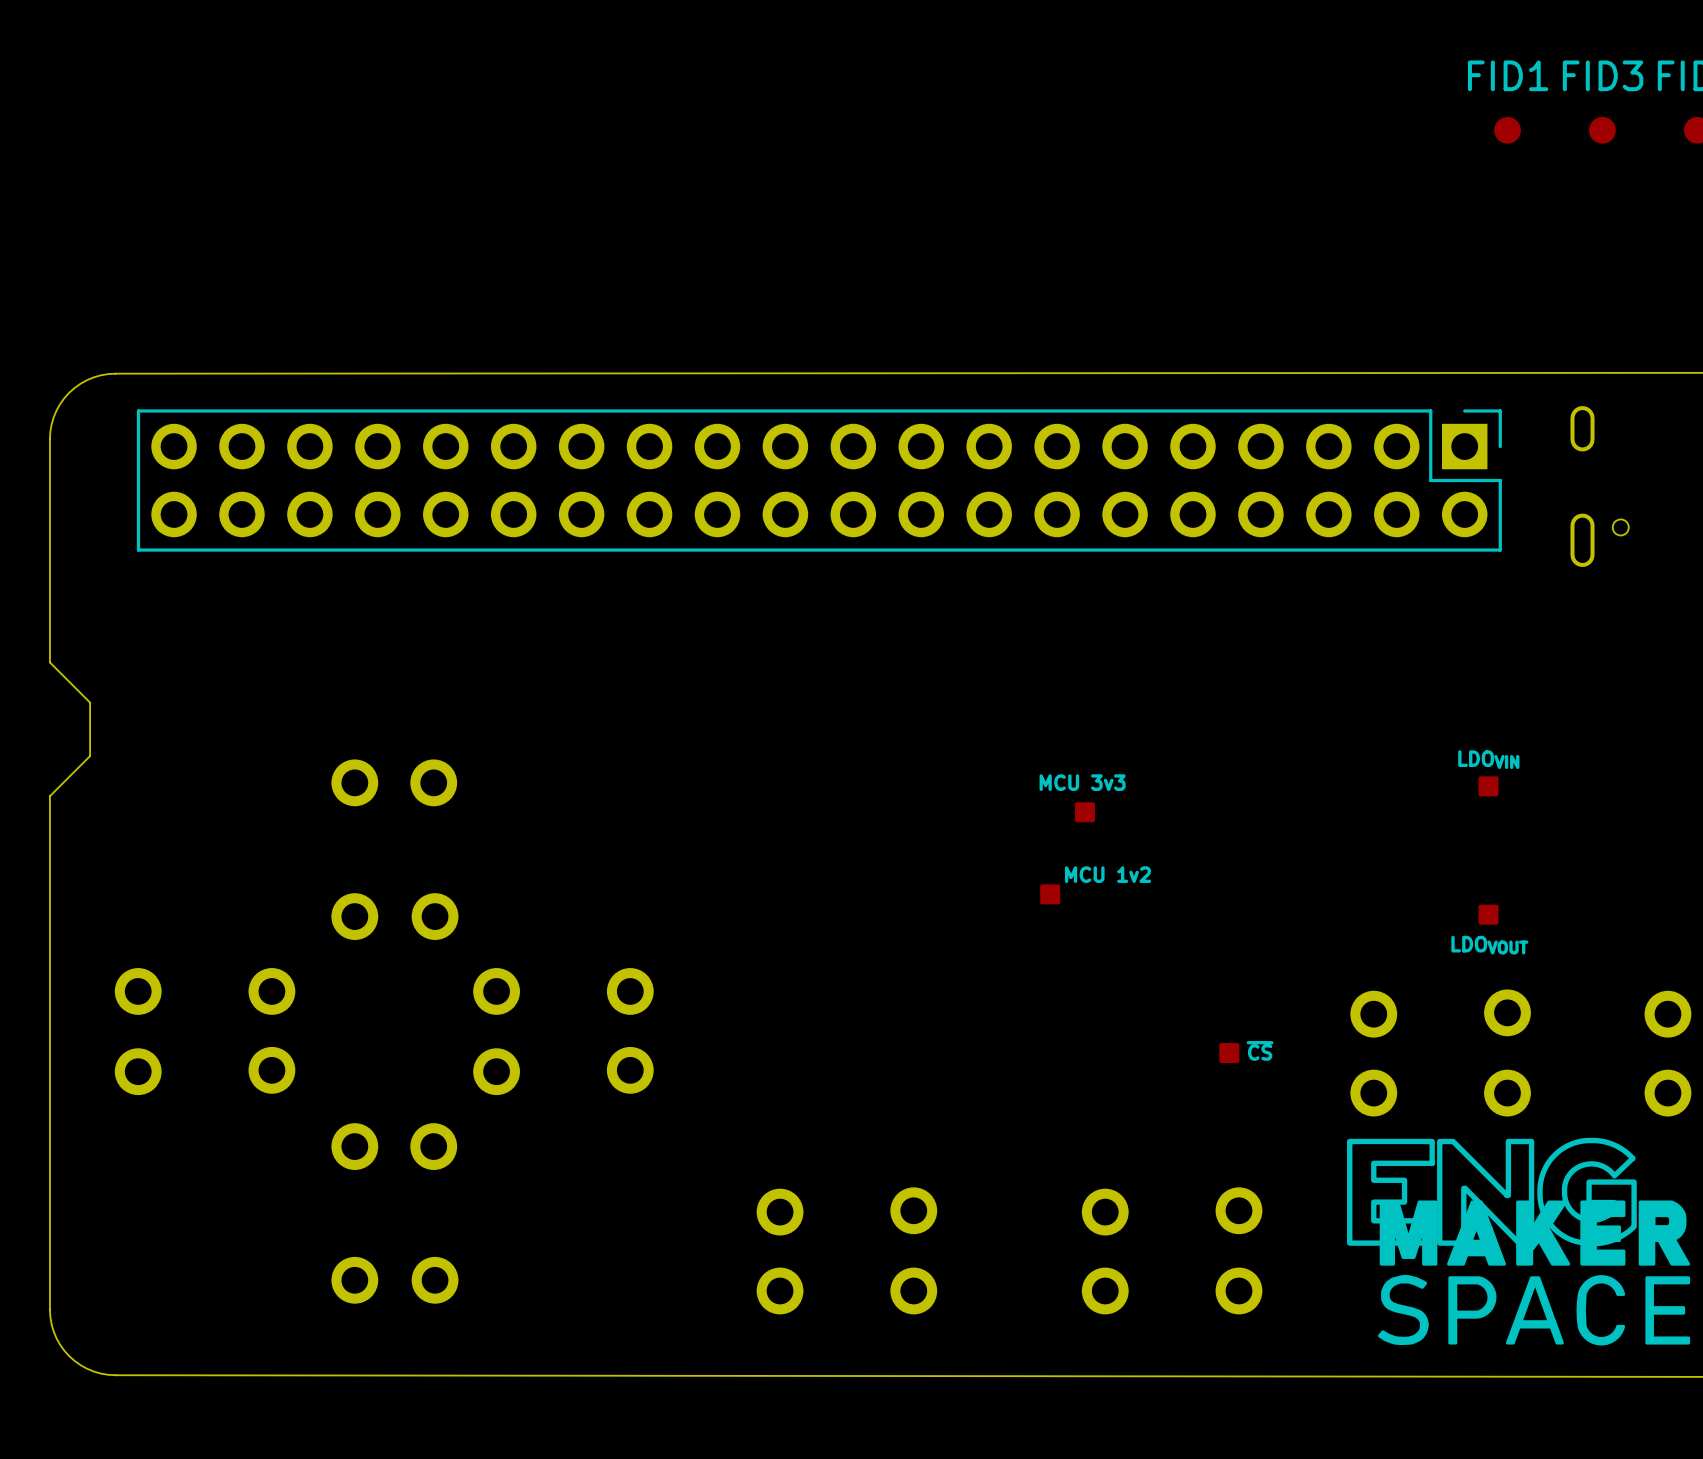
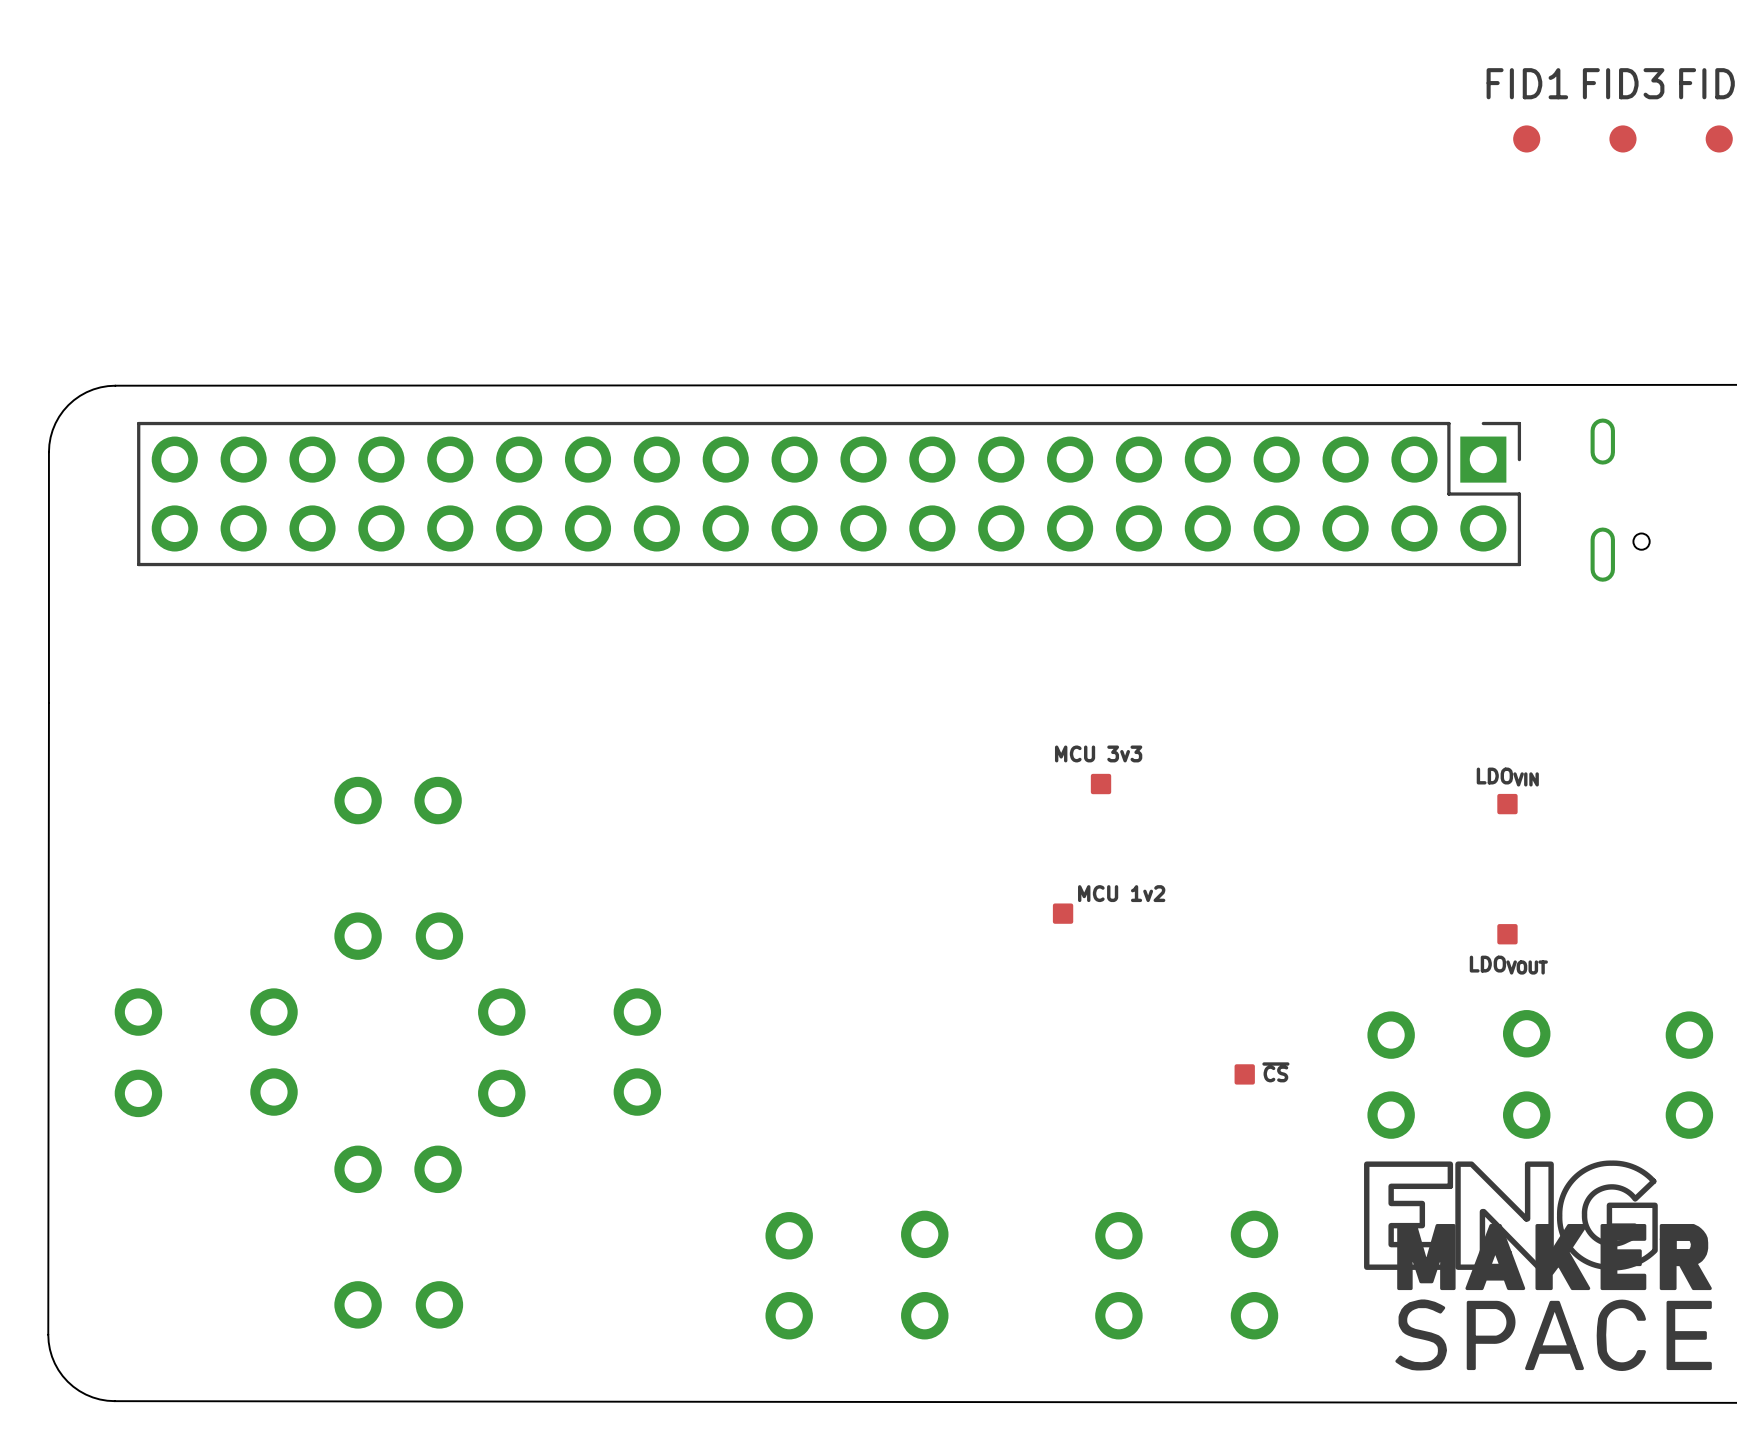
board edge: (49, 662) (90, 702) (90, 756) (49, 796) (50, 1317) (56, 1338) (69, 1356) (87, 1368) (100, 1373) (115, 1375) -> (48, 678) (48, 1342) (52, 1356) (58, 1370) (73, 1386) (92, 1397) (115, 1401)
part position: (1084, 812) -> (1101, 784)

